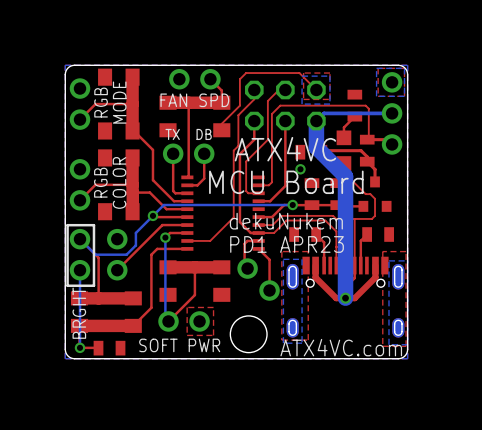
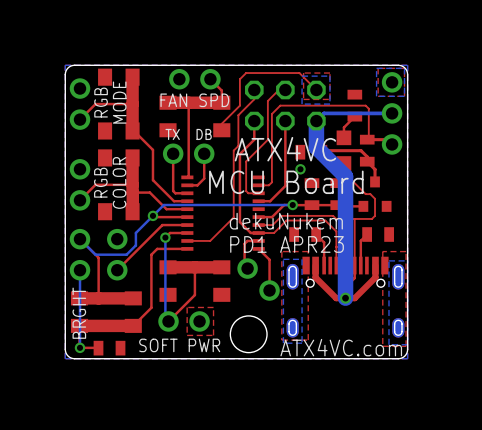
line: (93, 225) (93, 285) (67, 285) (67, 225) (93, 225) -> none

